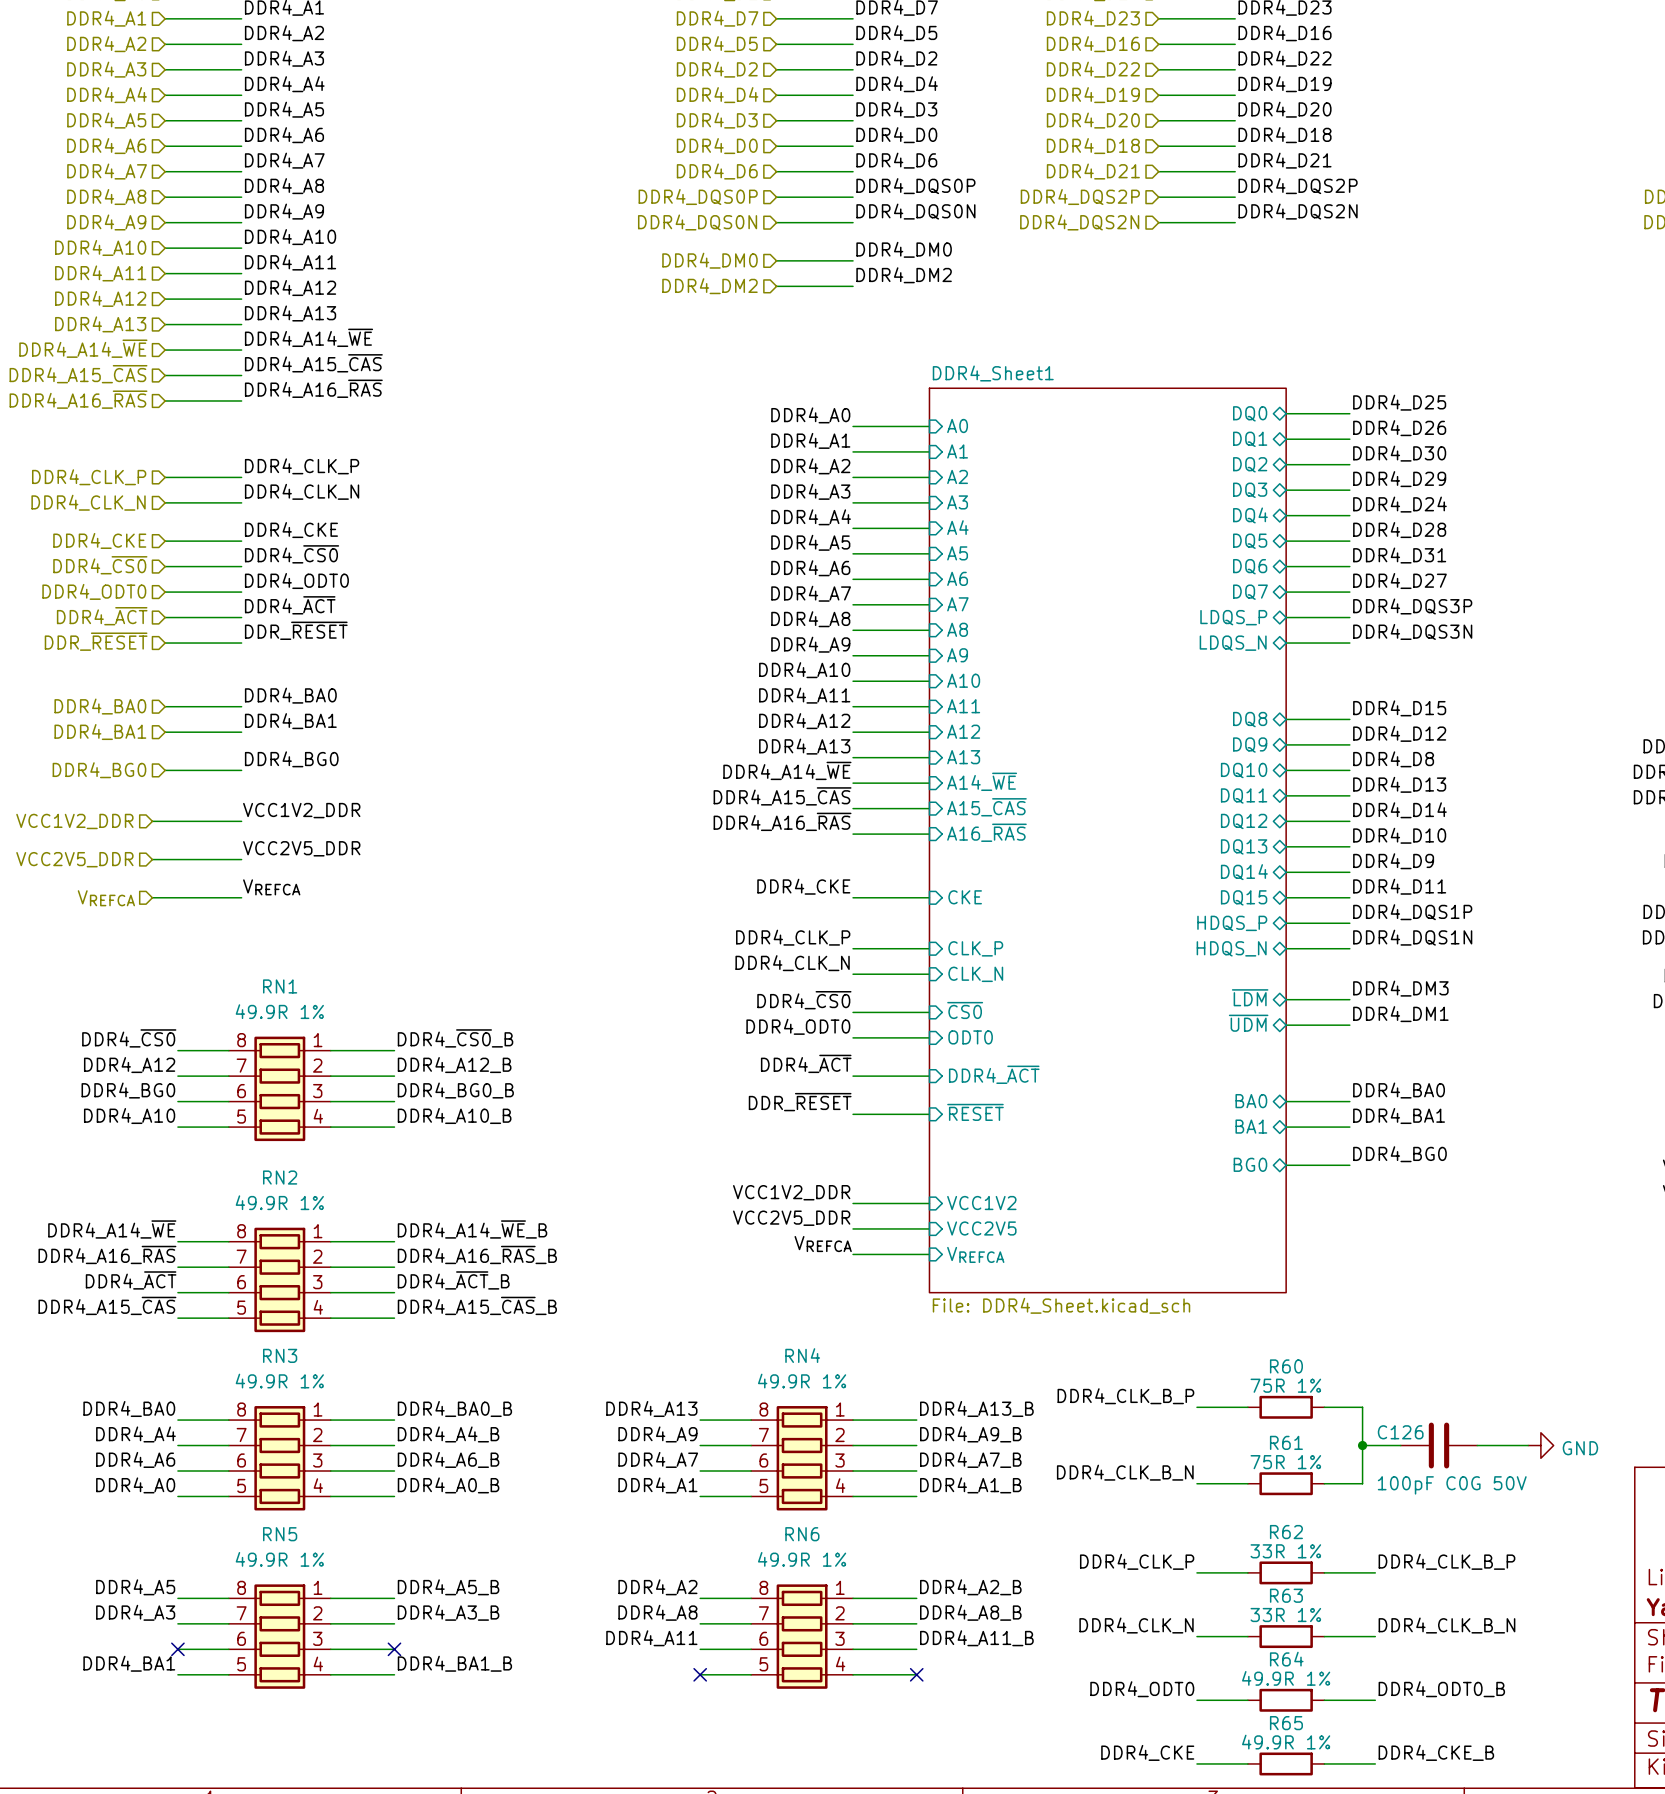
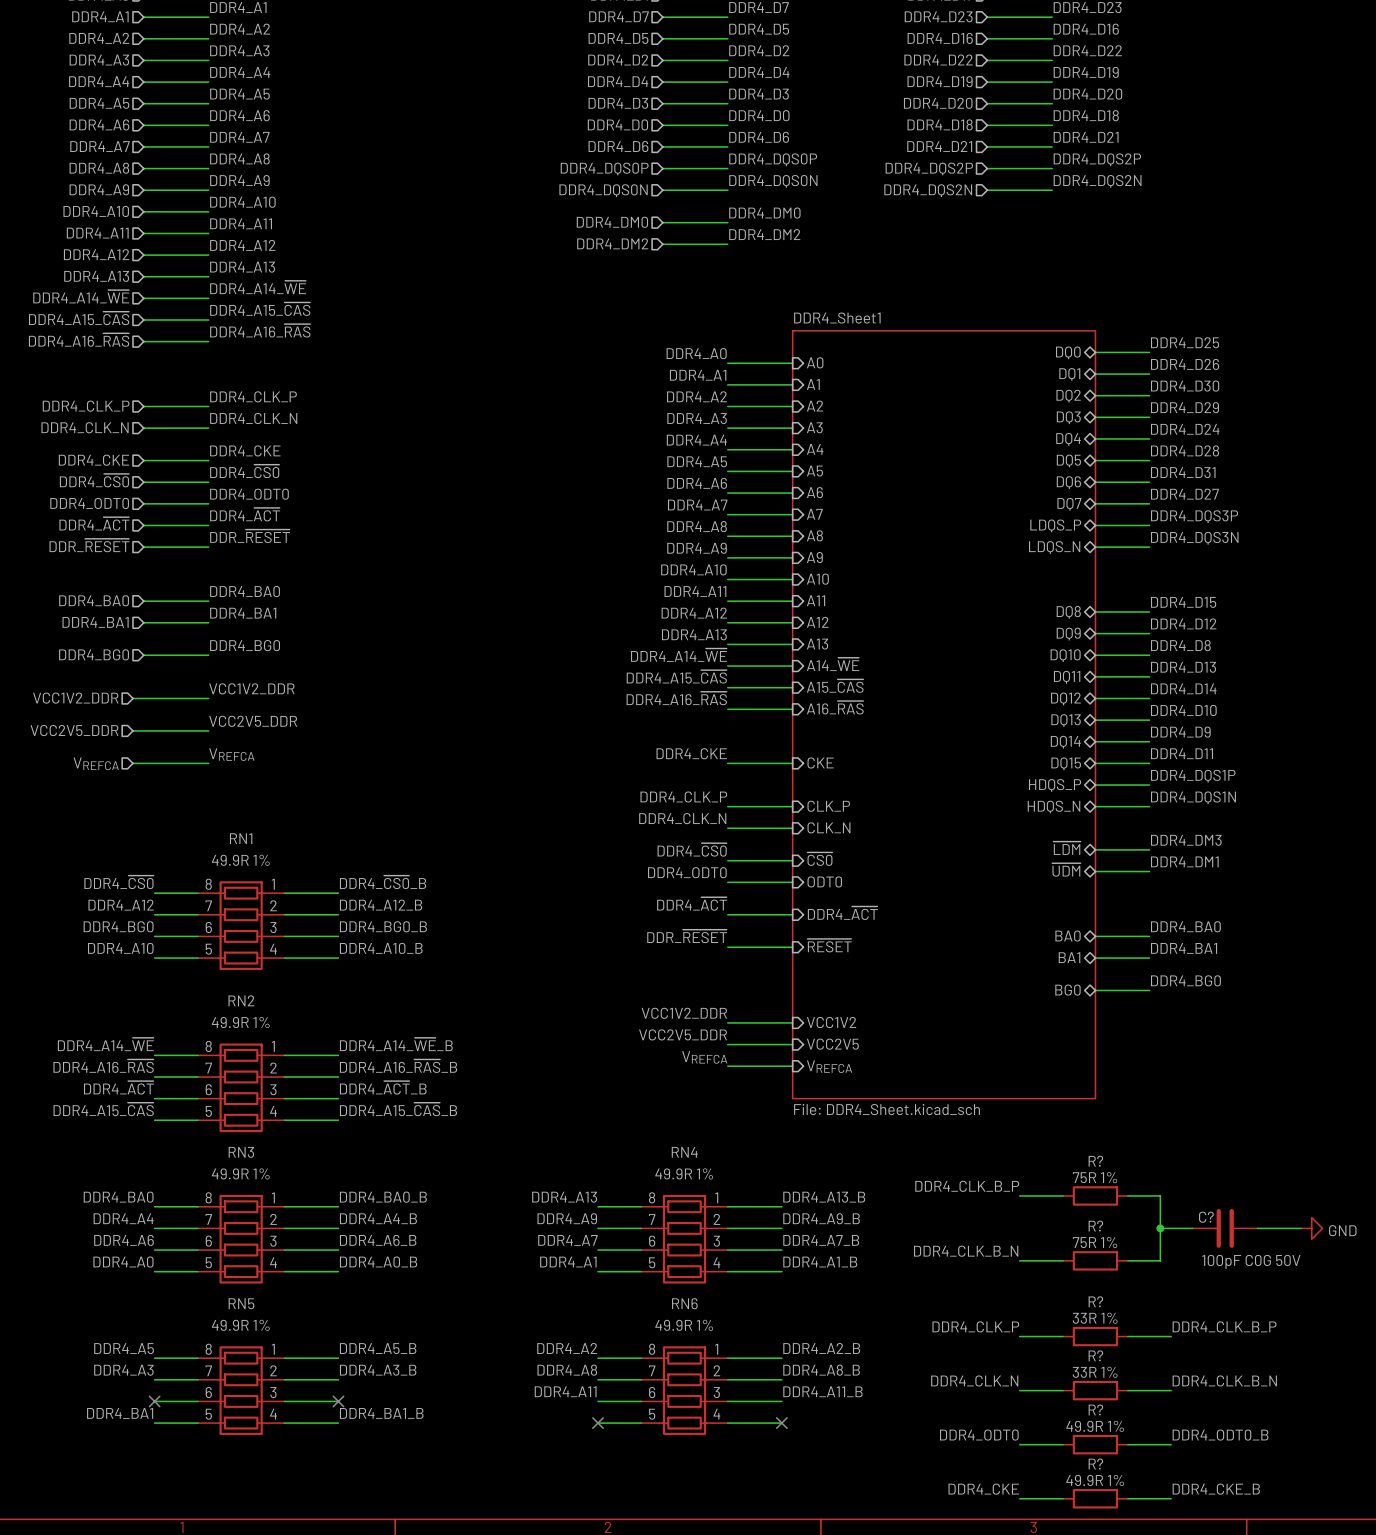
R60 name: R60 (1286, 1366) -> R? (1095, 1161)
C126 name: C126 (1400, 1432) -> C? (1206, 1217)
R61 name: R61 (1286, 1442) -> R? (1095, 1226)
R62 name: R62 (1286, 1532) -> R? (1095, 1301)
R63 name: R63 (1286, 1595) -> R? (1095, 1355)
R64 name: R64 (1286, 1659) -> R? (1095, 1409)
R65 name: R65 (1286, 1723) -> R? (1095, 1464)

